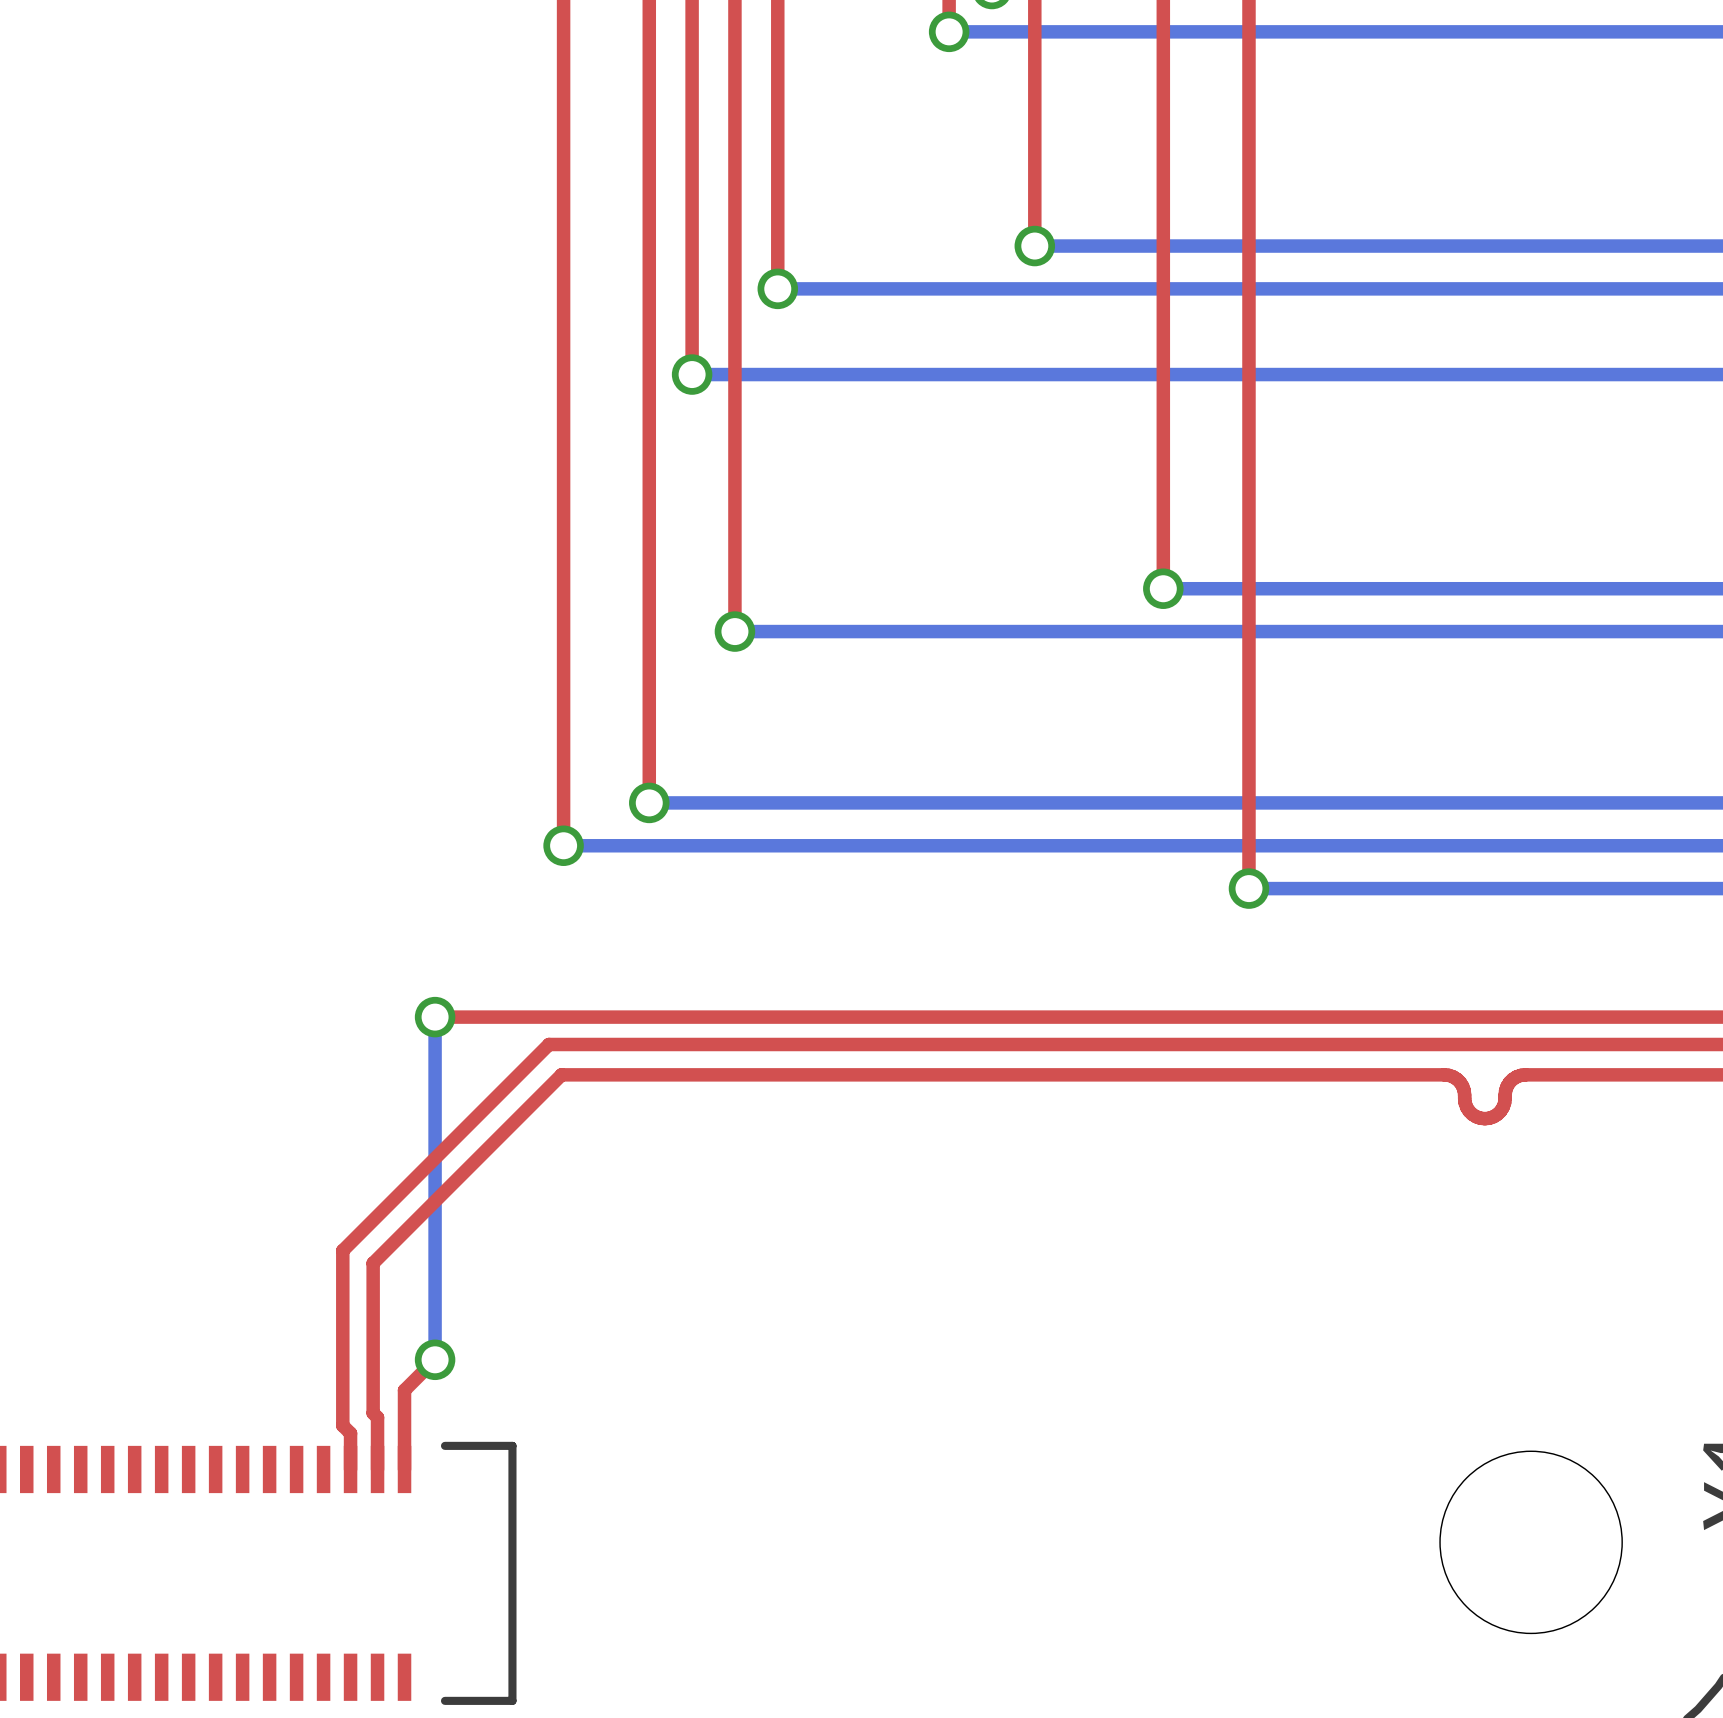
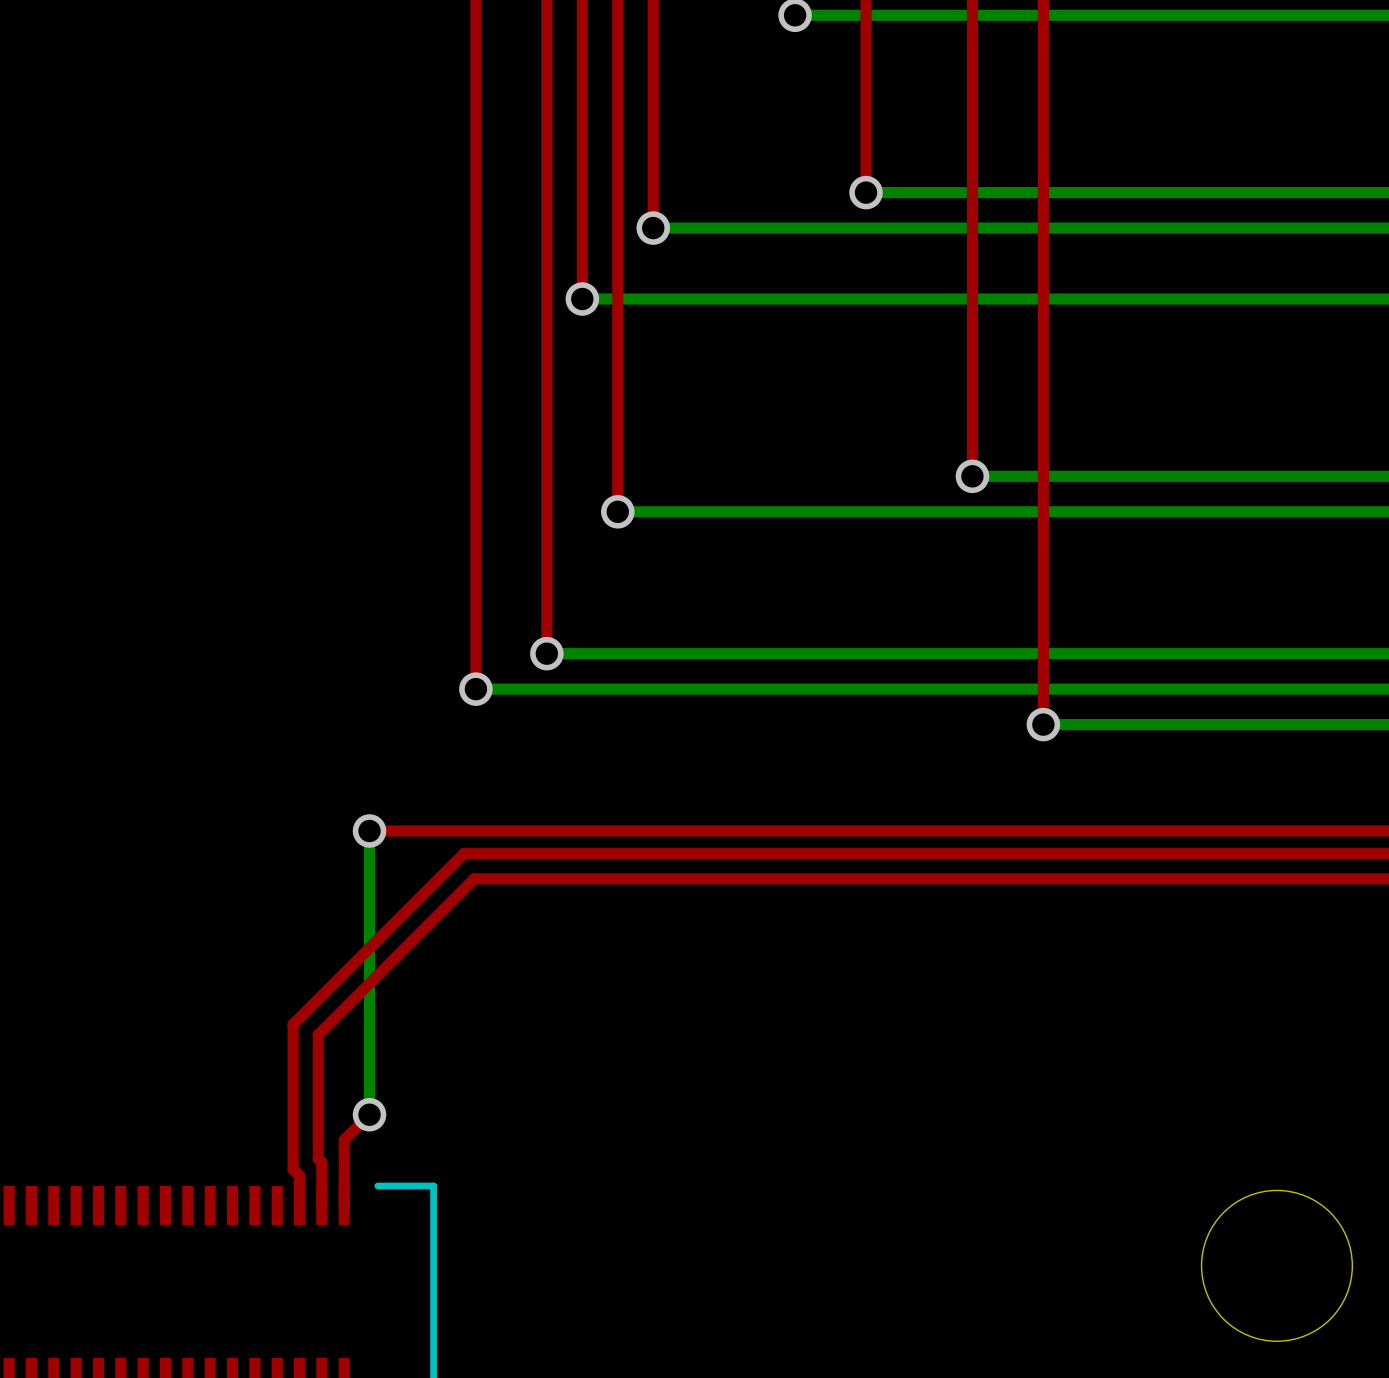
top track: (1444, 1074) (1453, 1076) (1460, 1082) (1469, 1111) (1476, 1116) (1484, 1118) (1493, 1116) (1500, 1111) (1509, 1082) (1516, 1076) (1525, 1074) -> (1205, 878) (1272, 878)

